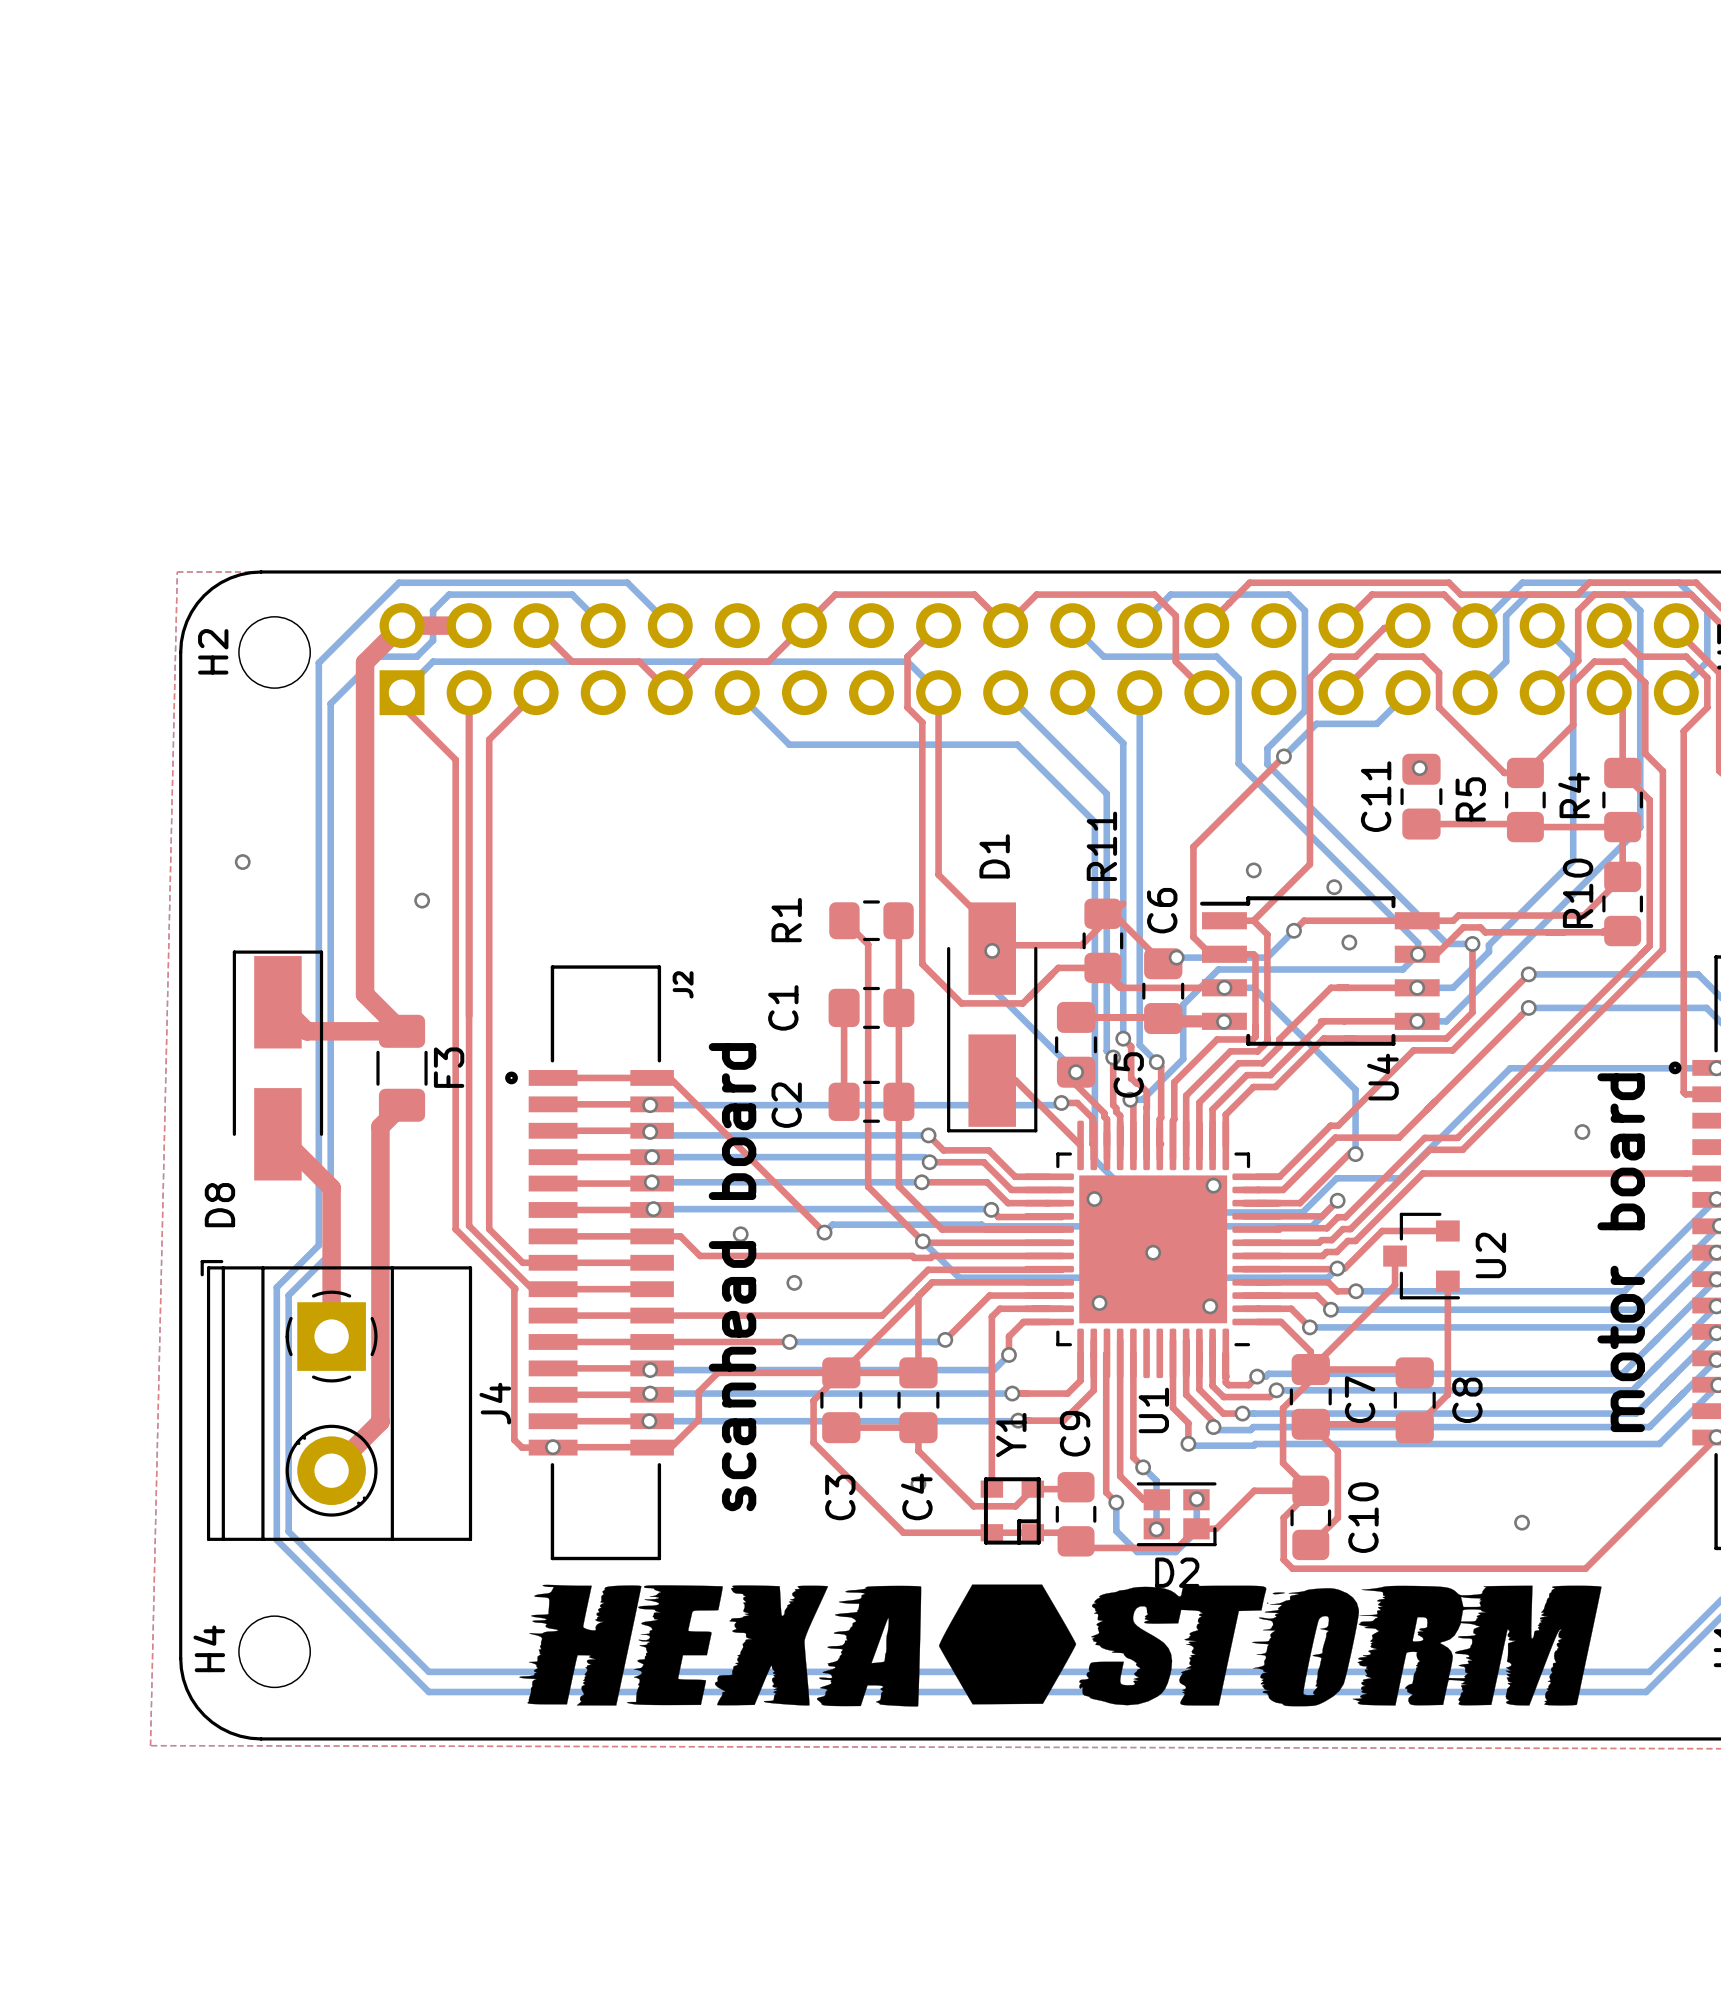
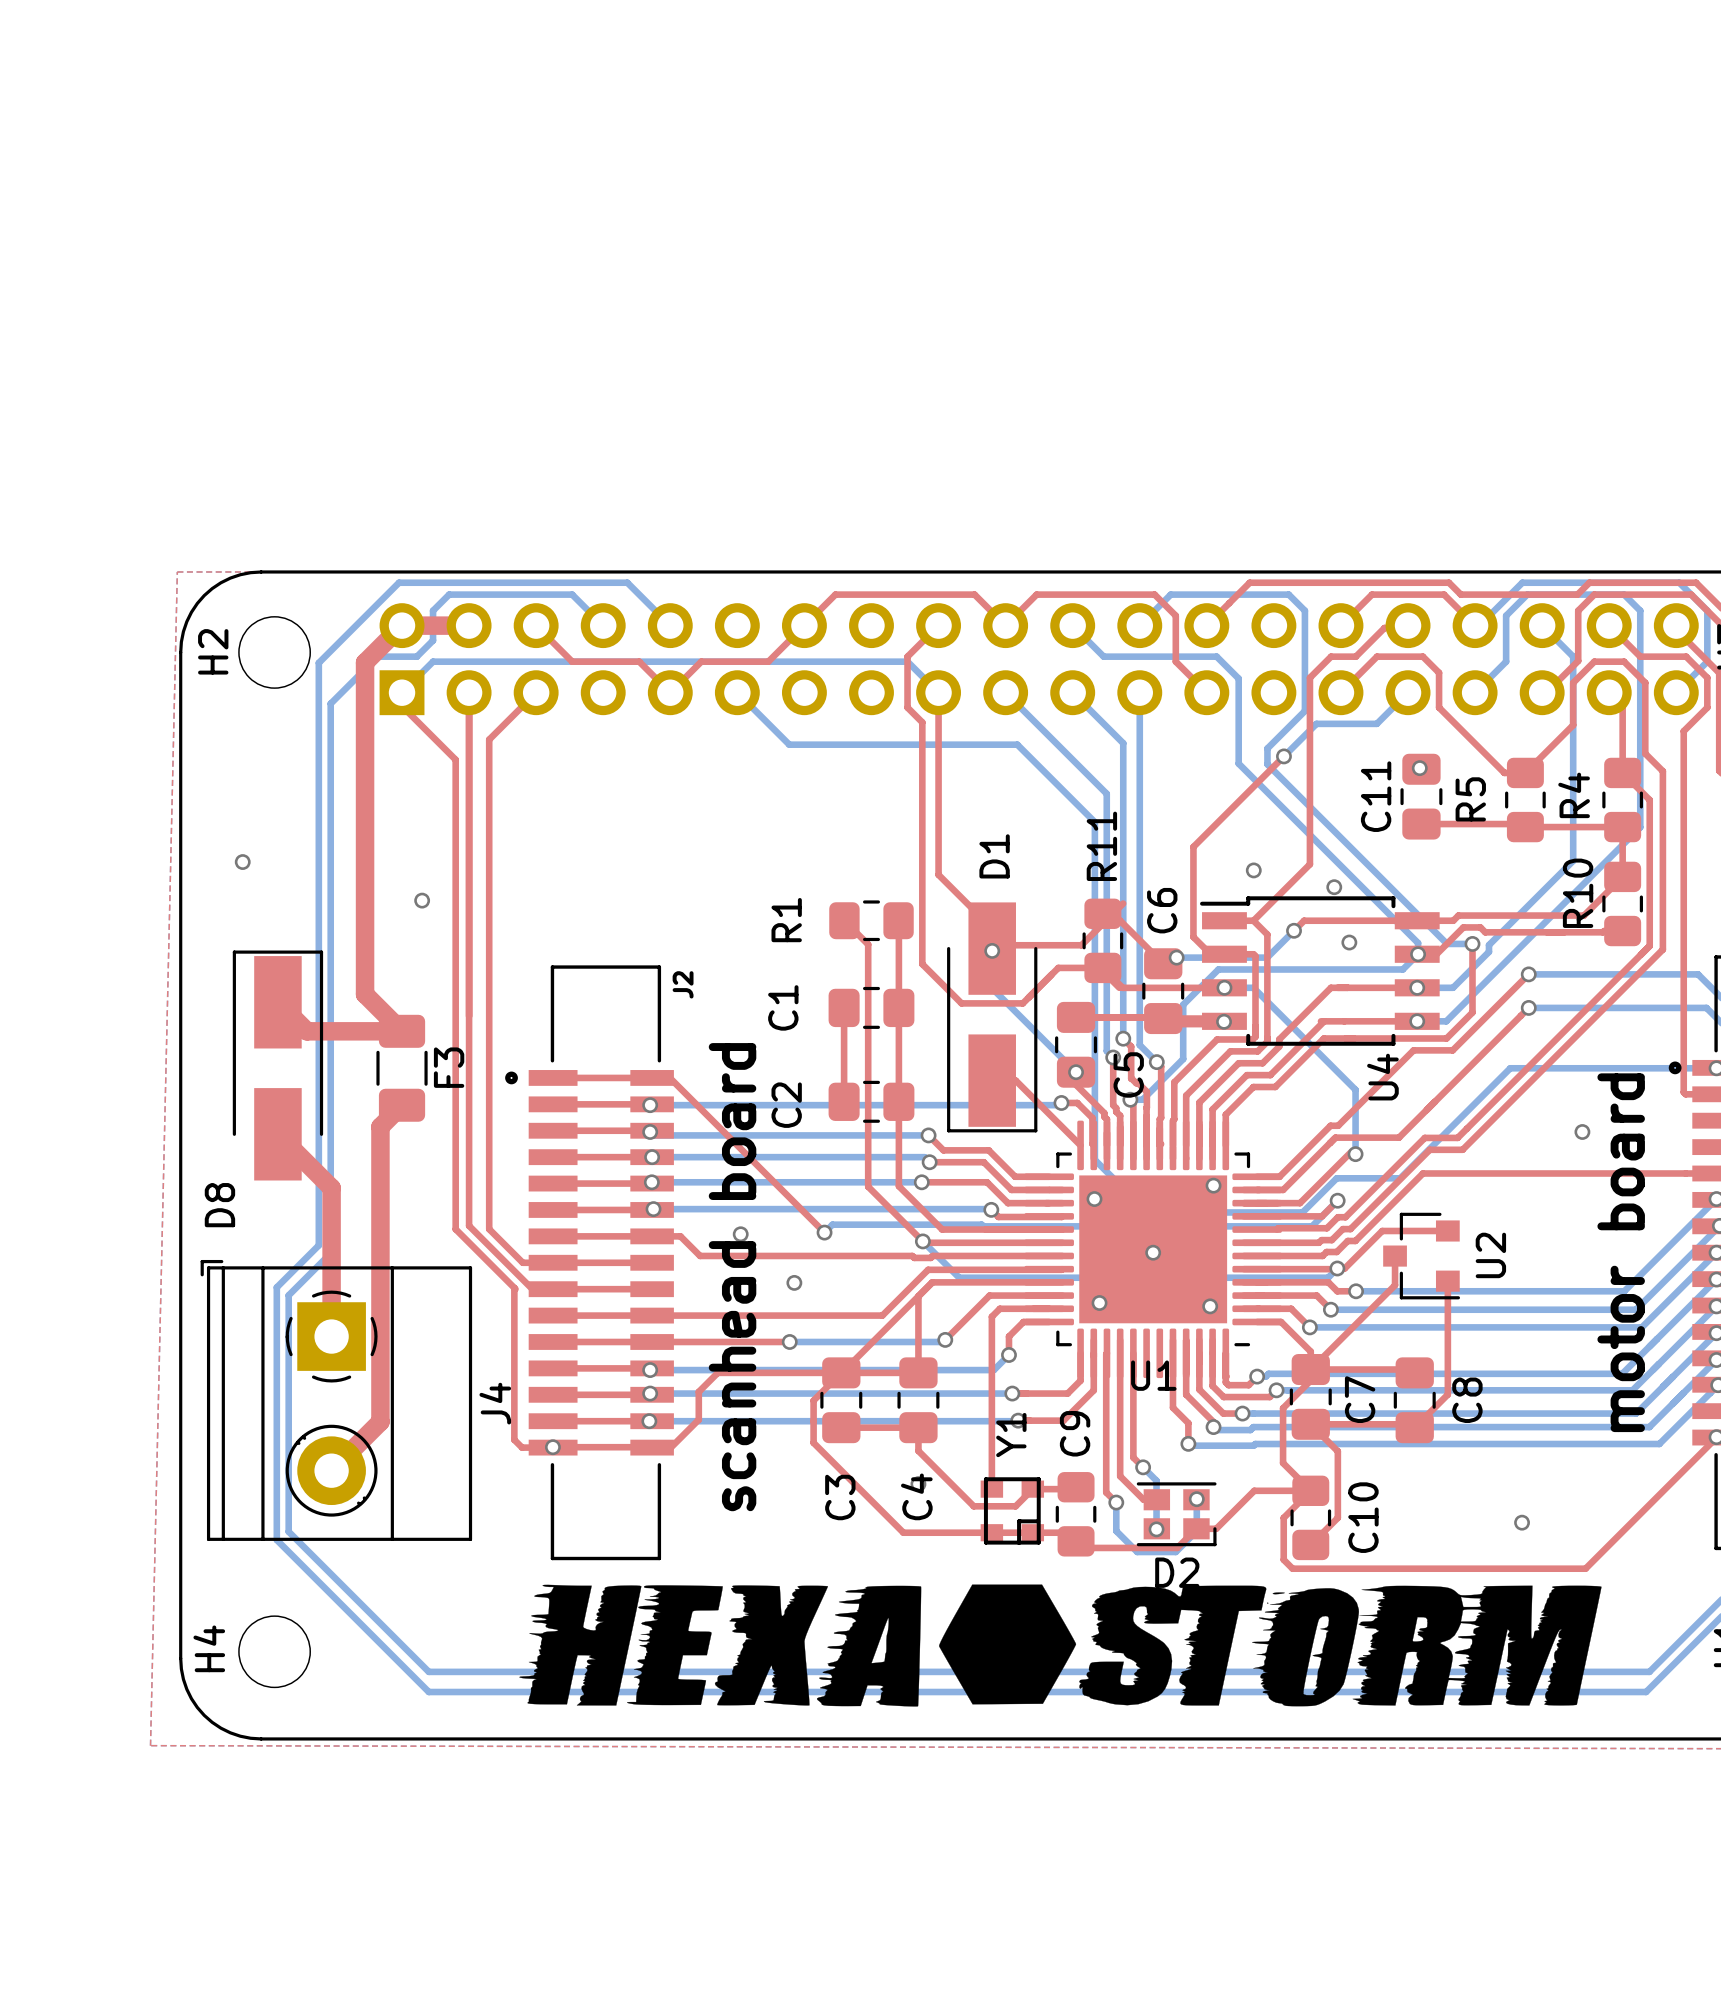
U1 name rotation: 0° (1153, 1410) -> 90° clockwise (1153, 1375)

